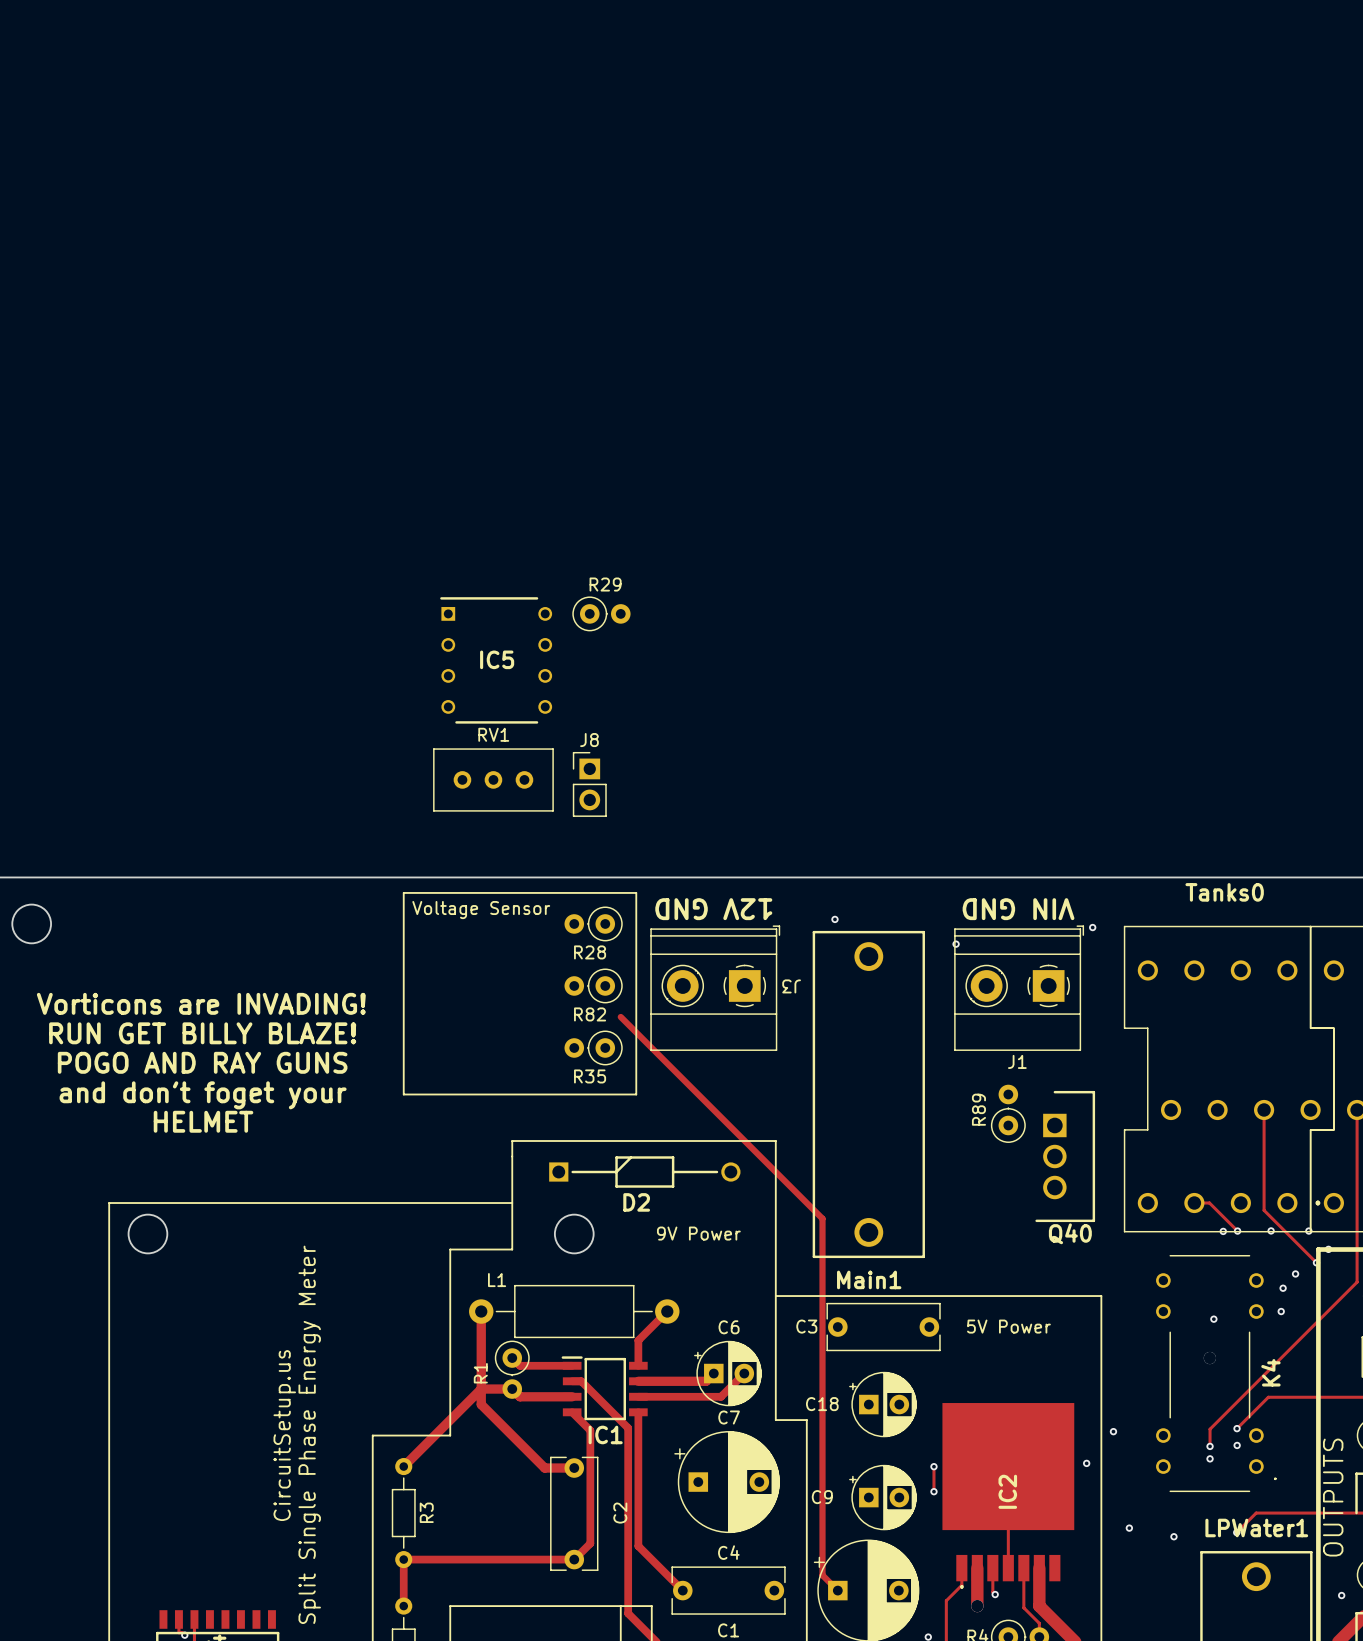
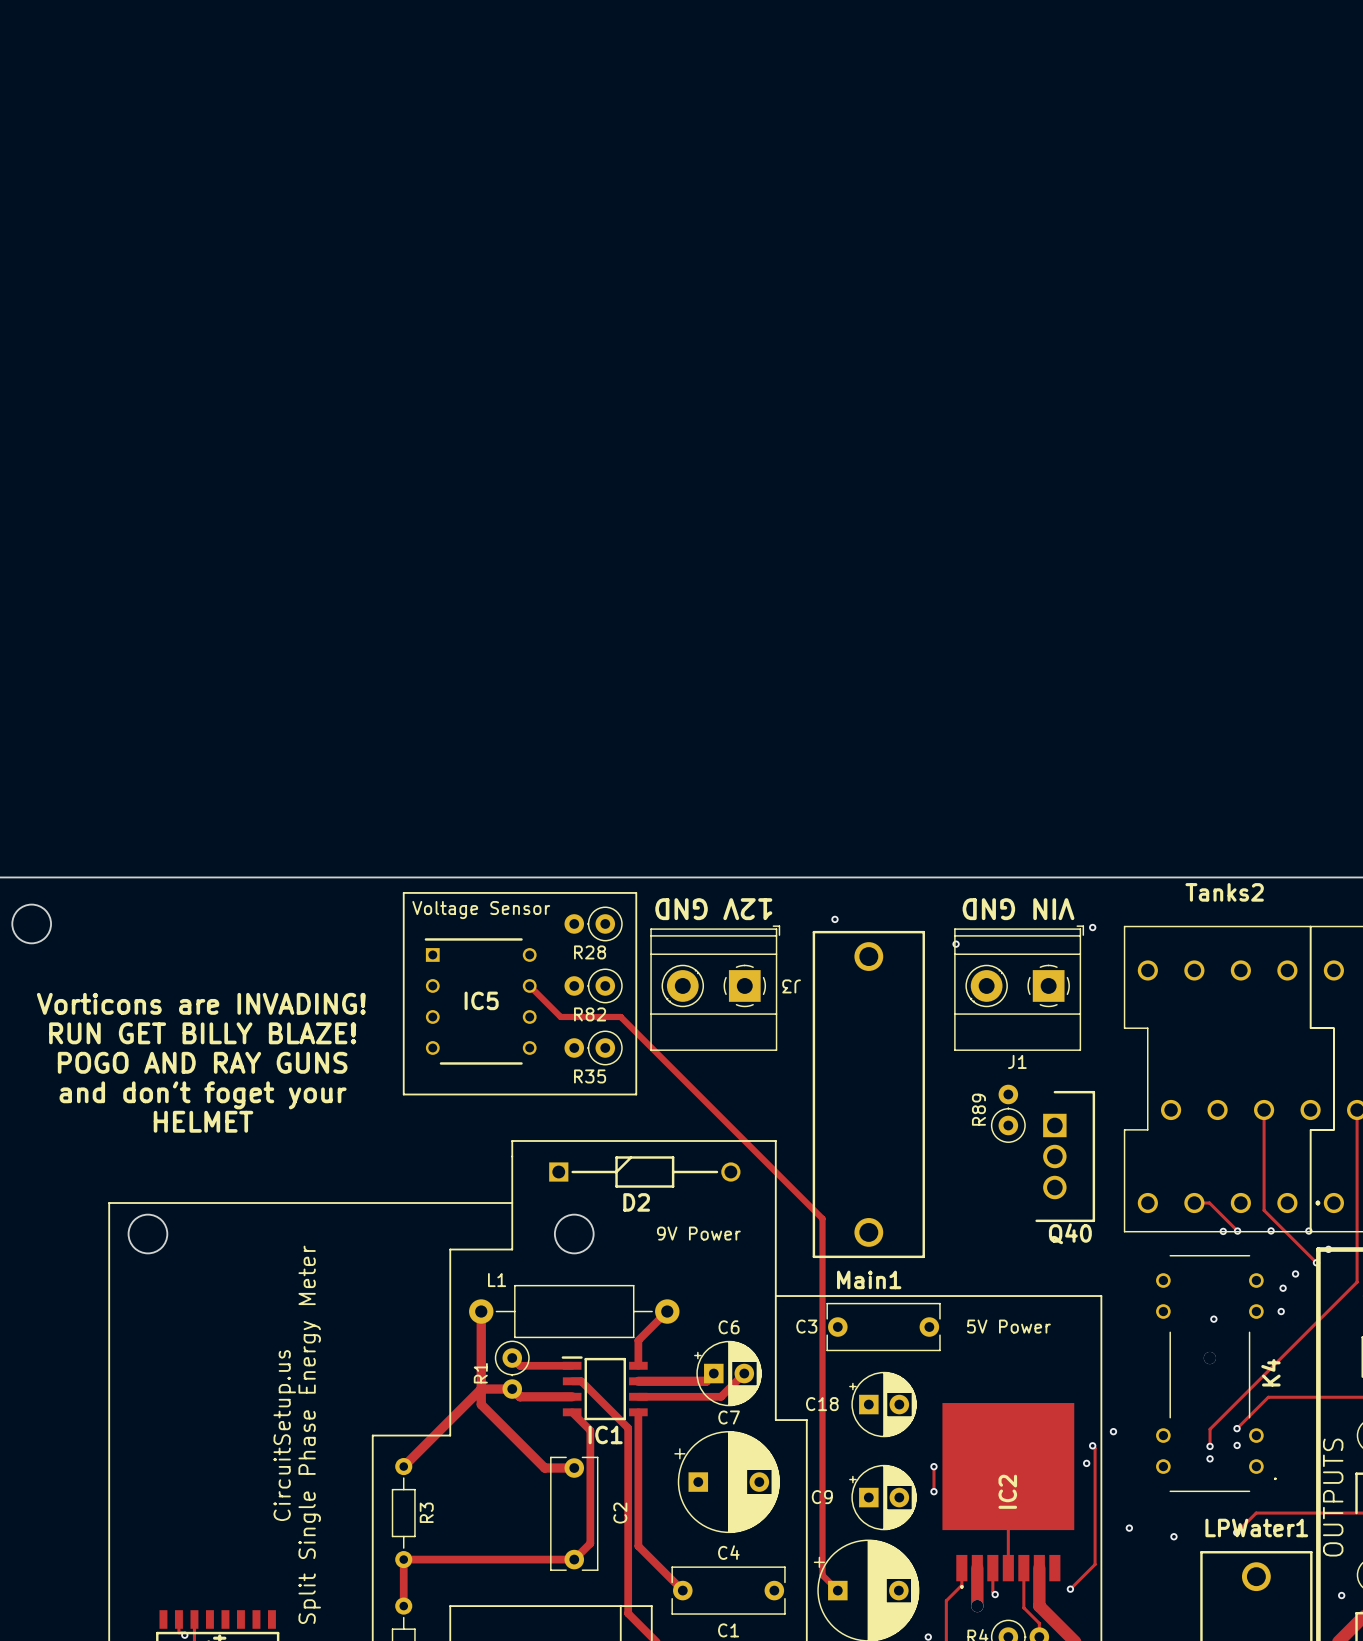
R29: (601, 613) -> none
IC5 position: (496, 660) -> (480, 1001)
RV1: (493, 779) -> none
J8: (589, 784) -> none
Tanks0 name: Tanks0 (1224, 892) -> Tanks2 (1224, 892)
track: none -> (529, 985) (560, 1016) (620, 1016)
track: none -> (1092, 1445) (1095, 1448) (1095, 1564) (1070, 1589)
via: none -> (1092, 1445)
via: none -> (1070, 1589)

